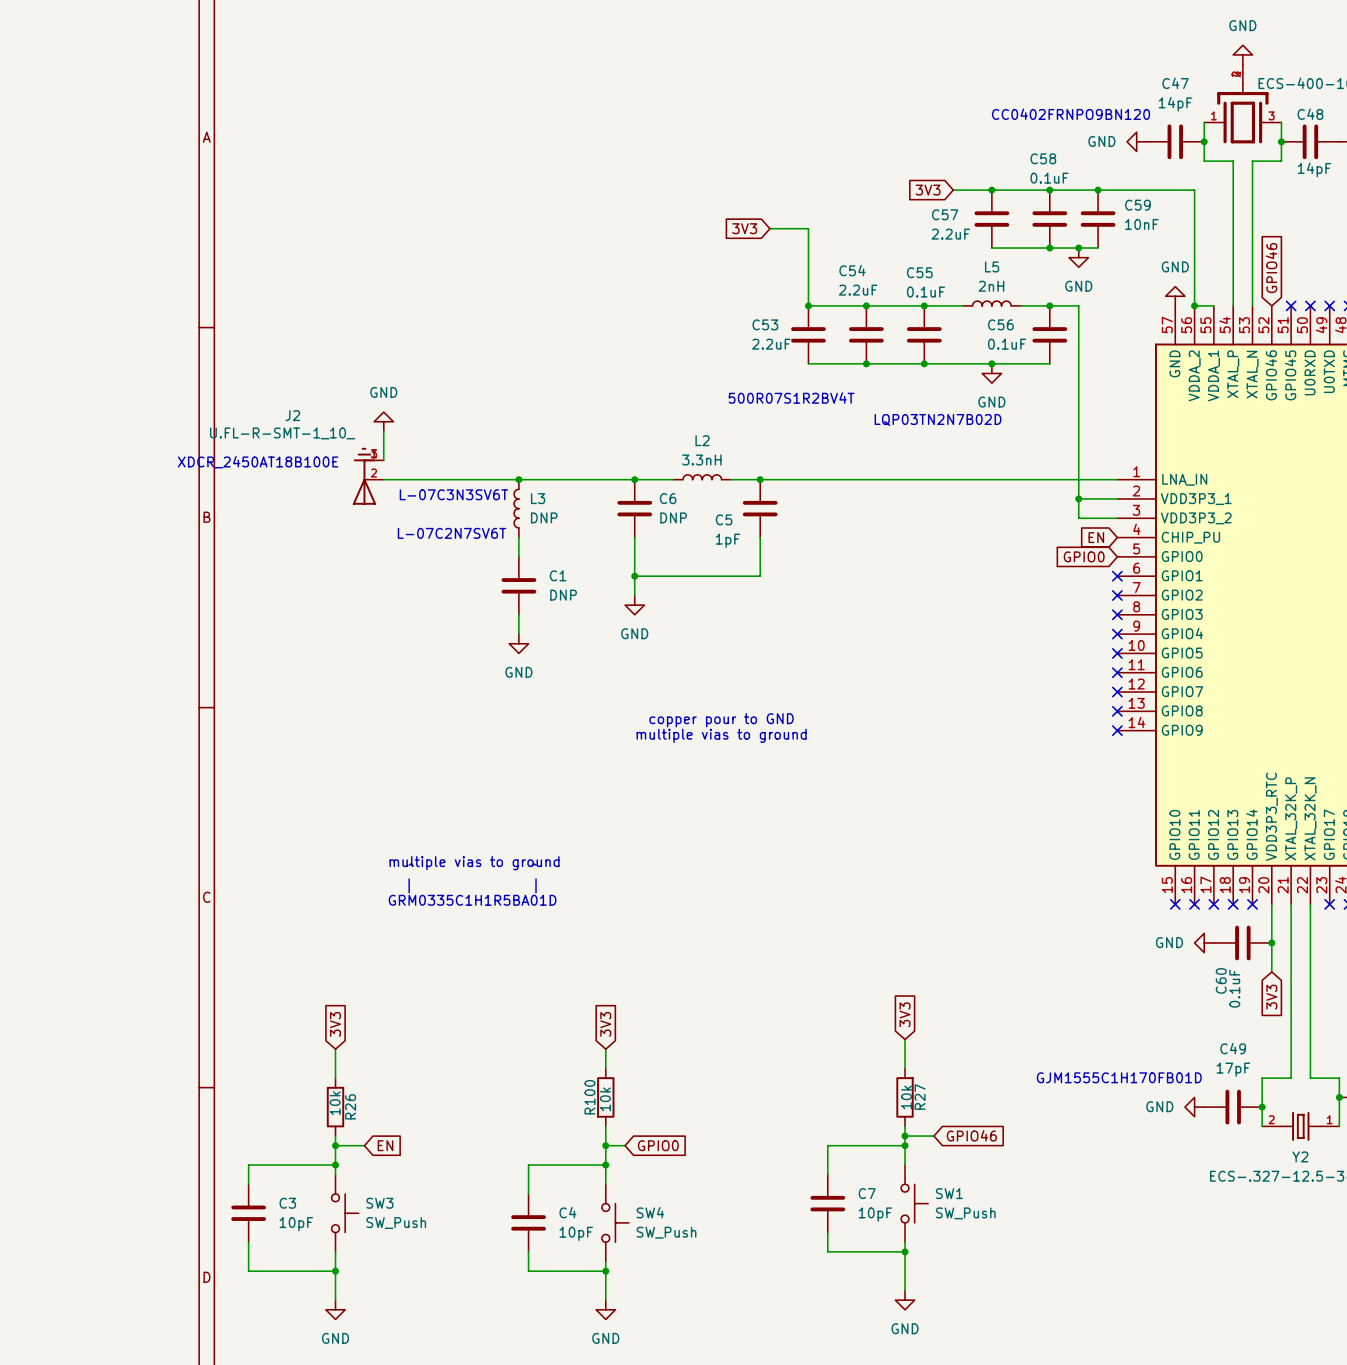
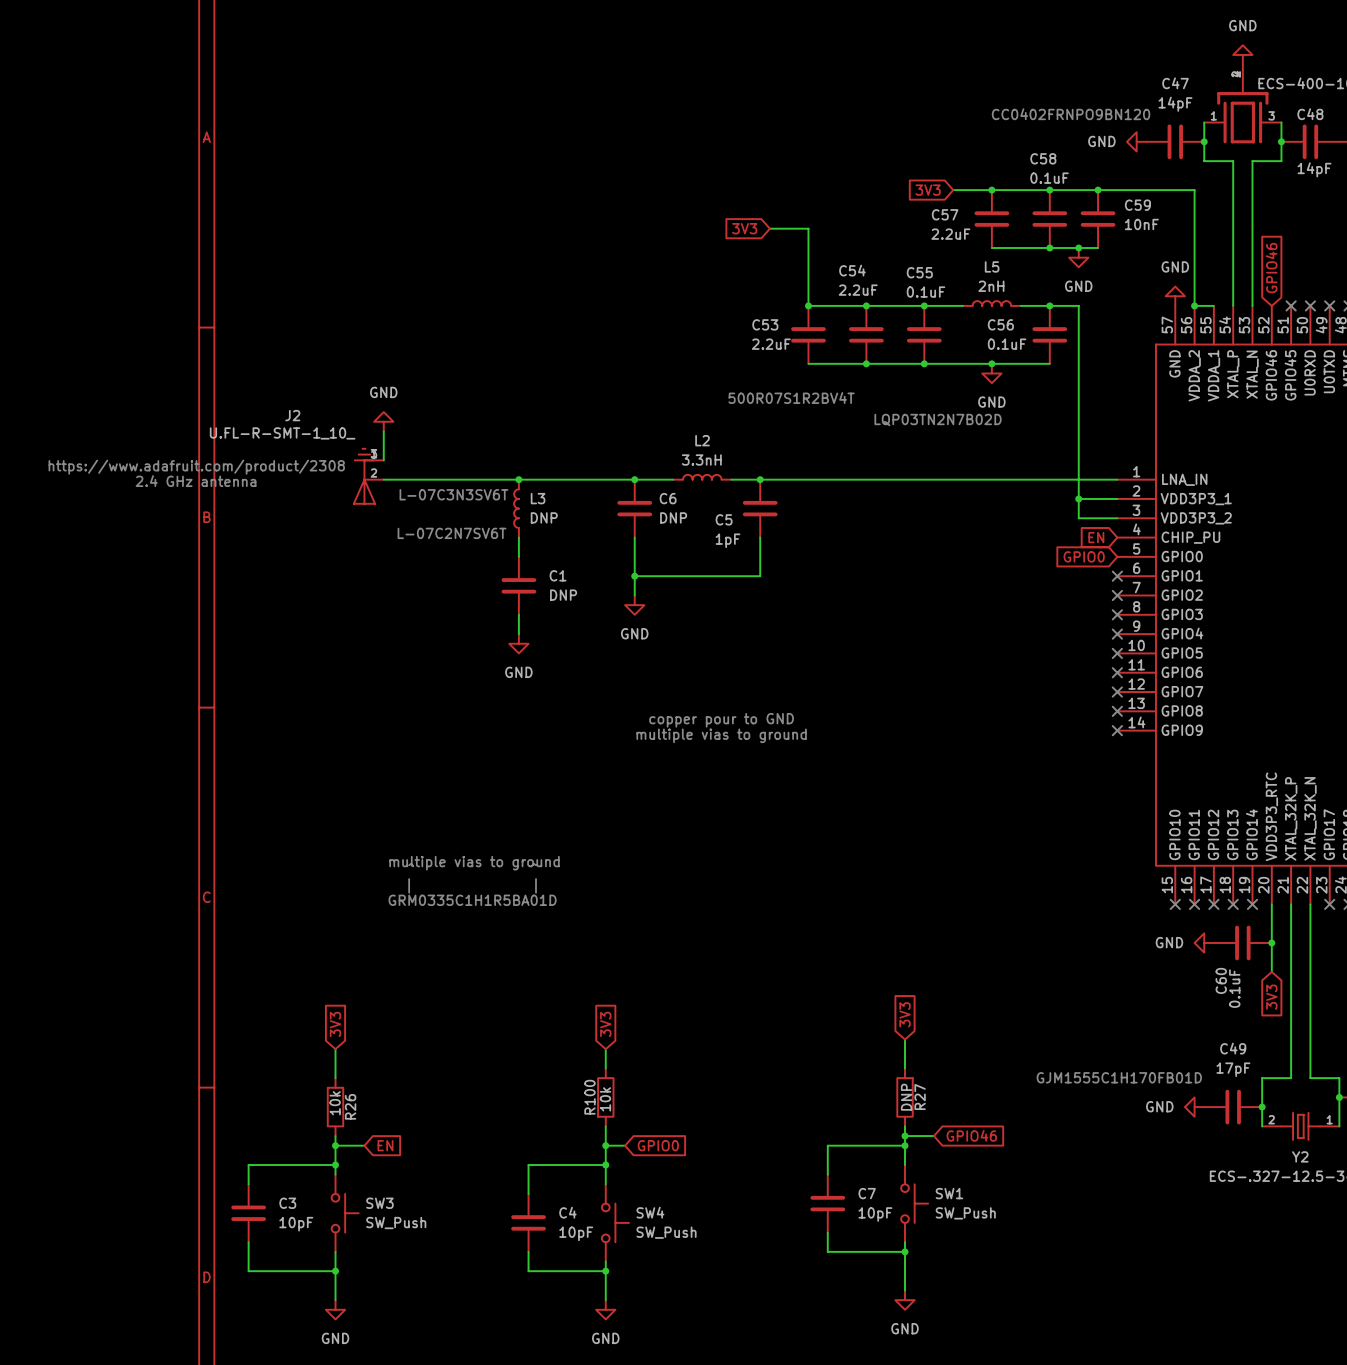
text: XDCR_2450AT18B100E (258, 462) -> none
text: none -> https://www.adafruit.com/product/2308 (196, 467)
text: none -> 2.4 GHz antenna (196, 481)
R27 value: 10k (906, 1097) -> DNP (906, 1097)

